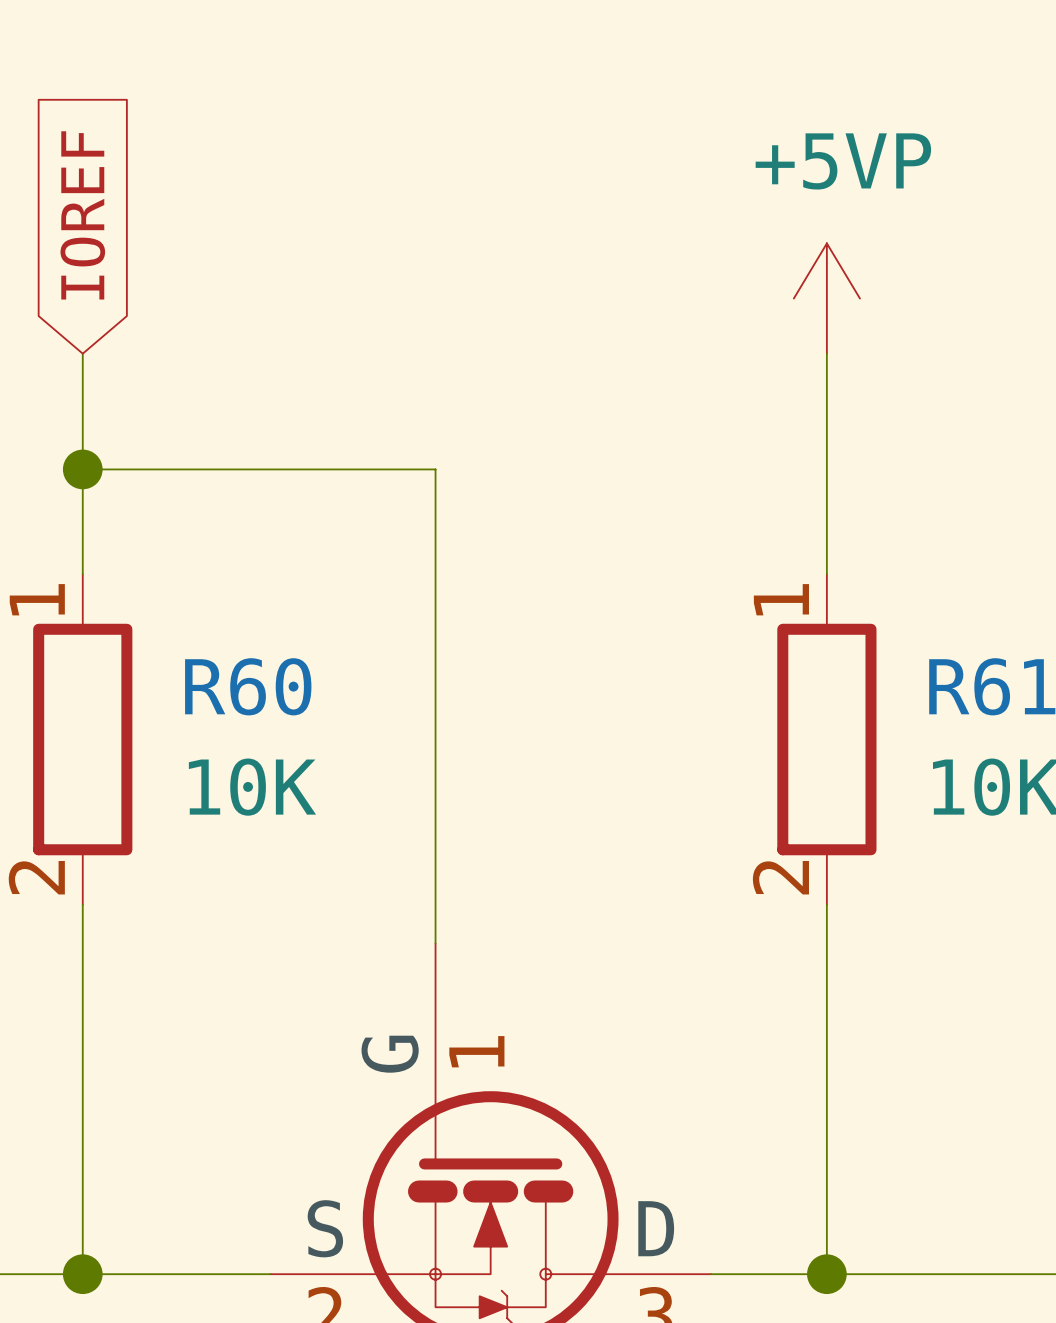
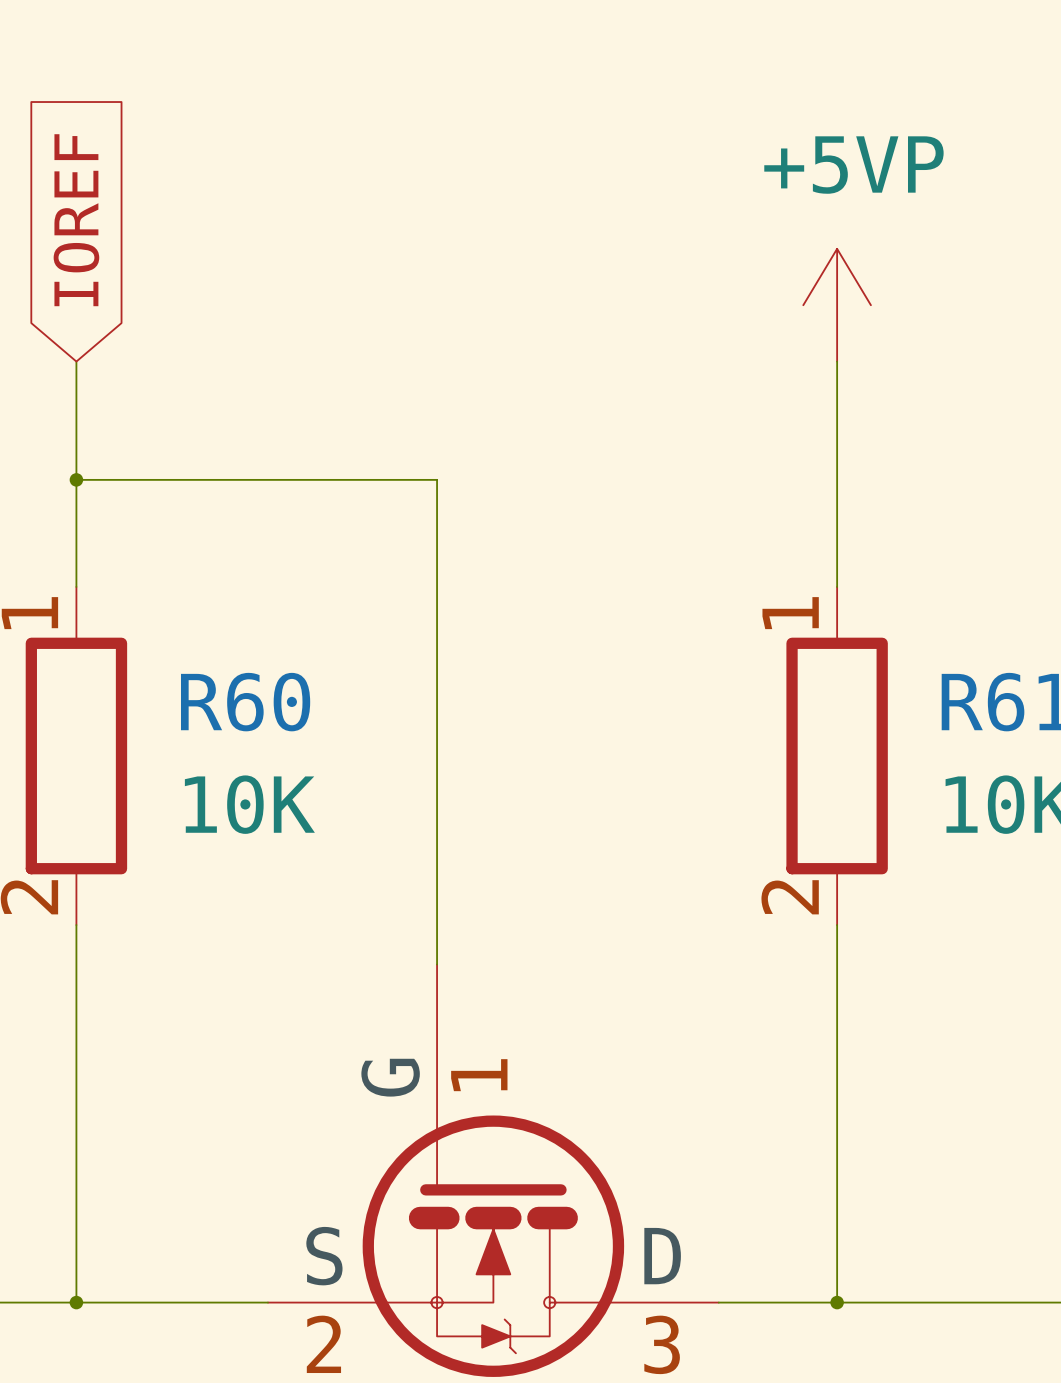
junction size: [62, 449, 103, 490] -> [69, 473, 84, 487]
junction size: [62, 1254, 103, 1295] -> [69, 1295, 84, 1310]
junction size: [807, 1254, 847, 1295] -> [830, 1295, 844, 1310]

